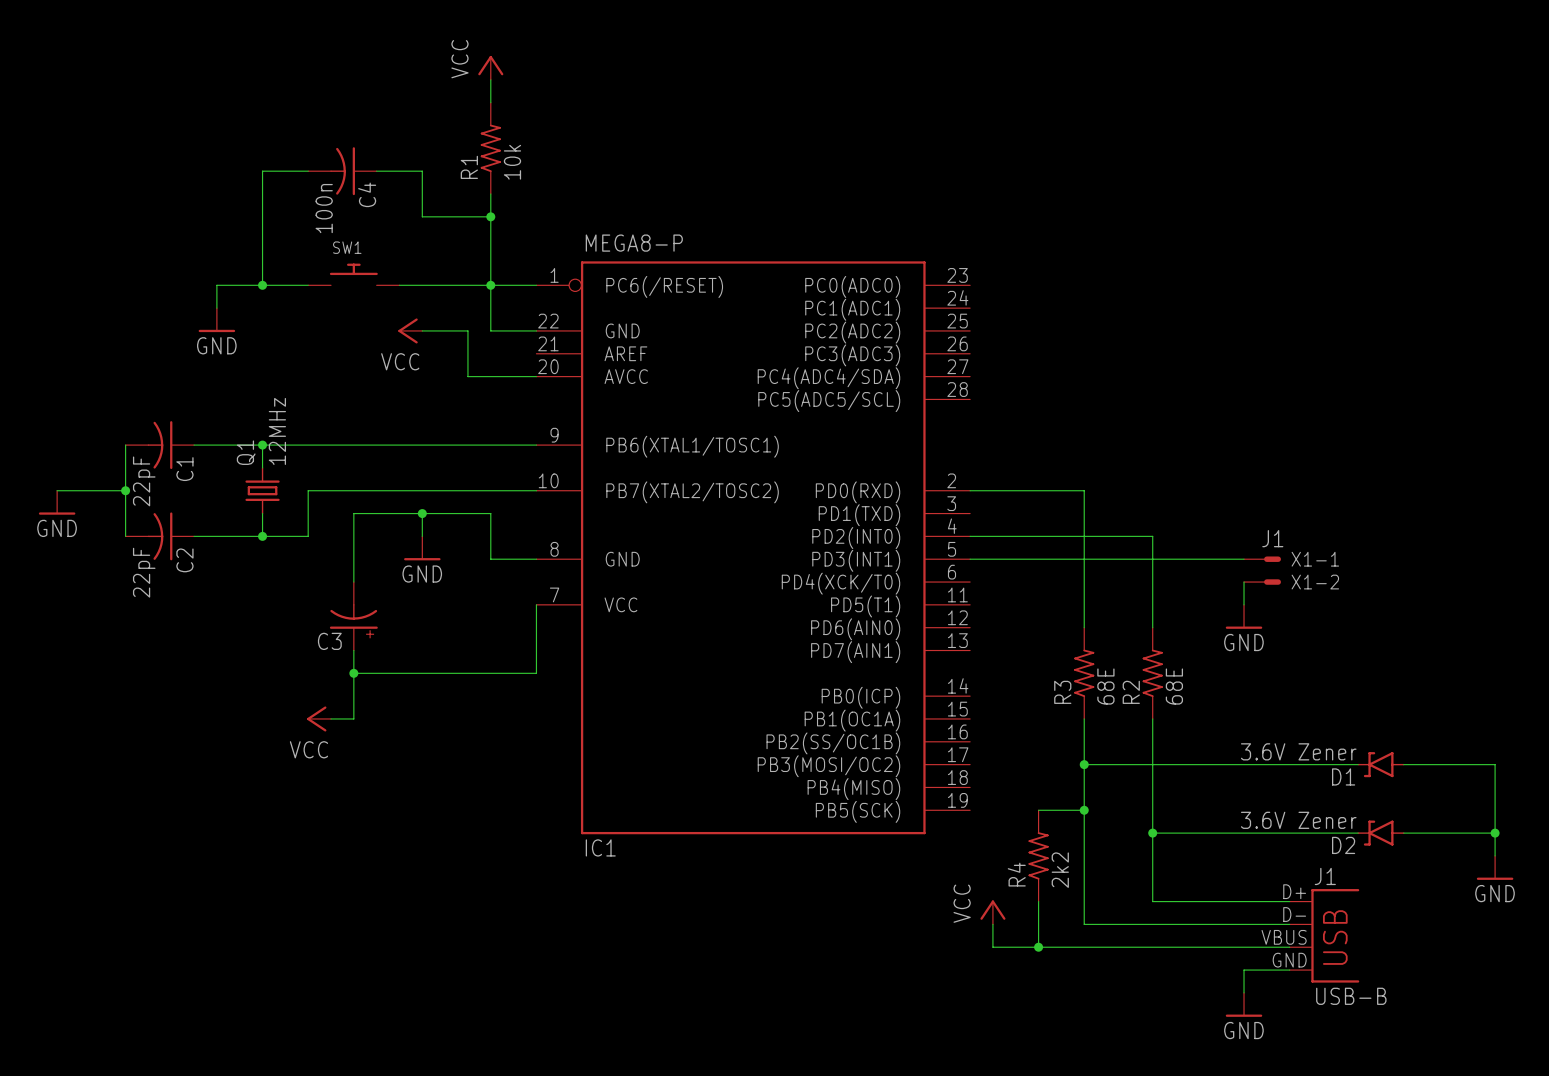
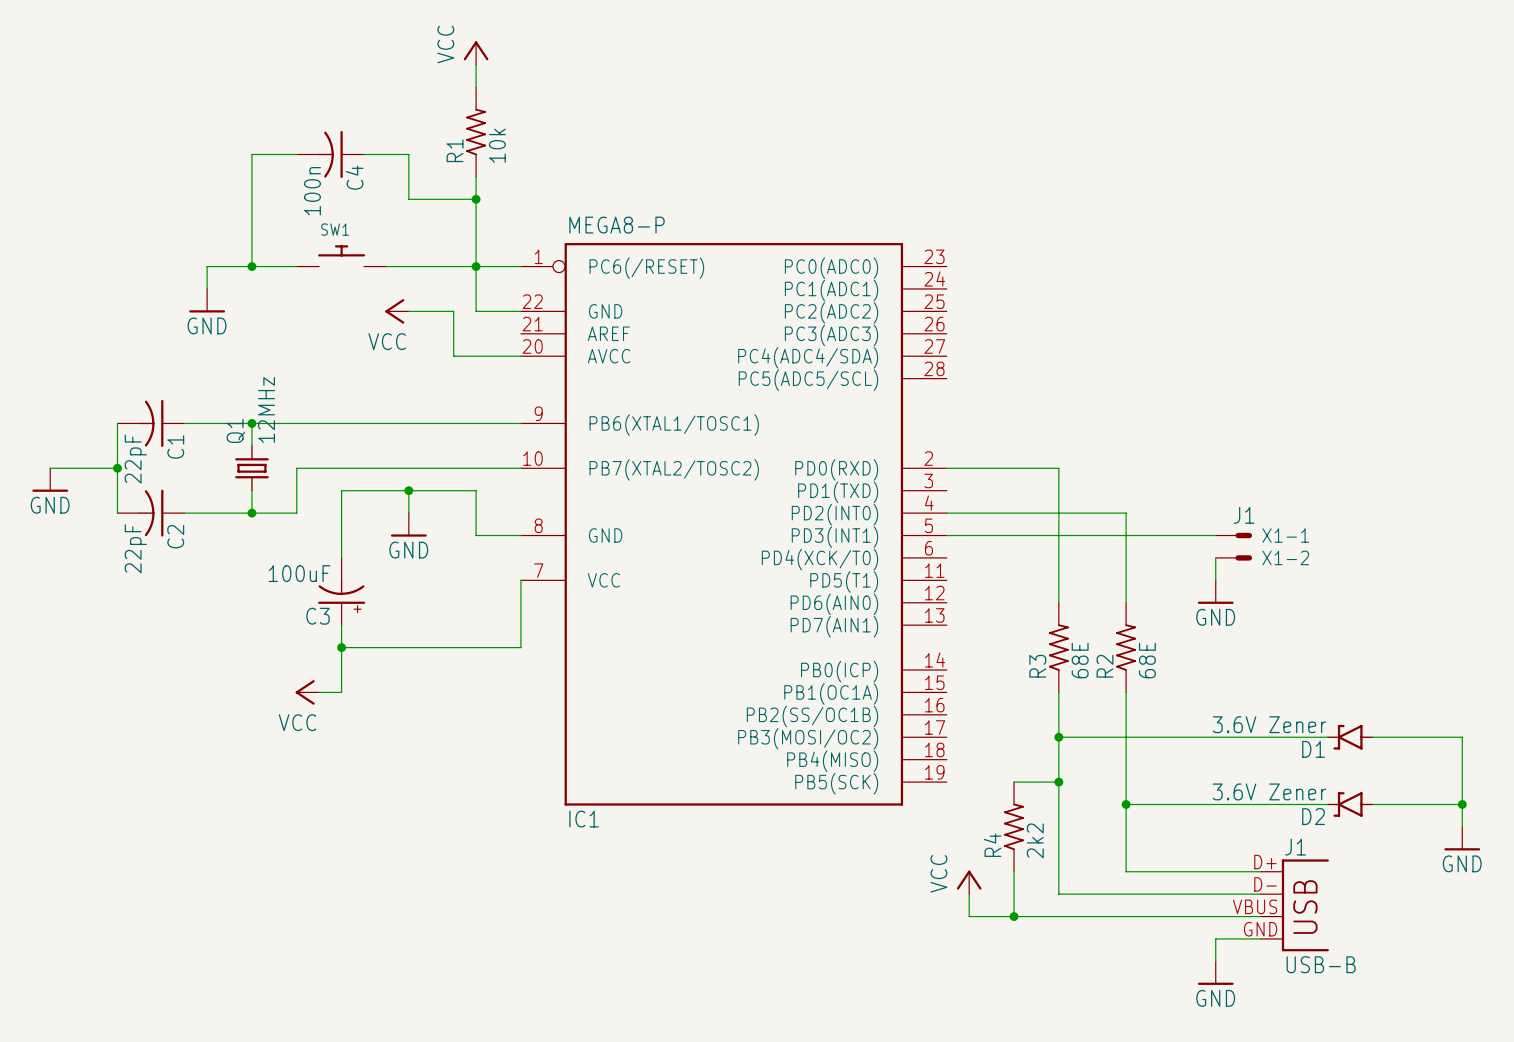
C3 value: none -> 100uF (299, 573)

